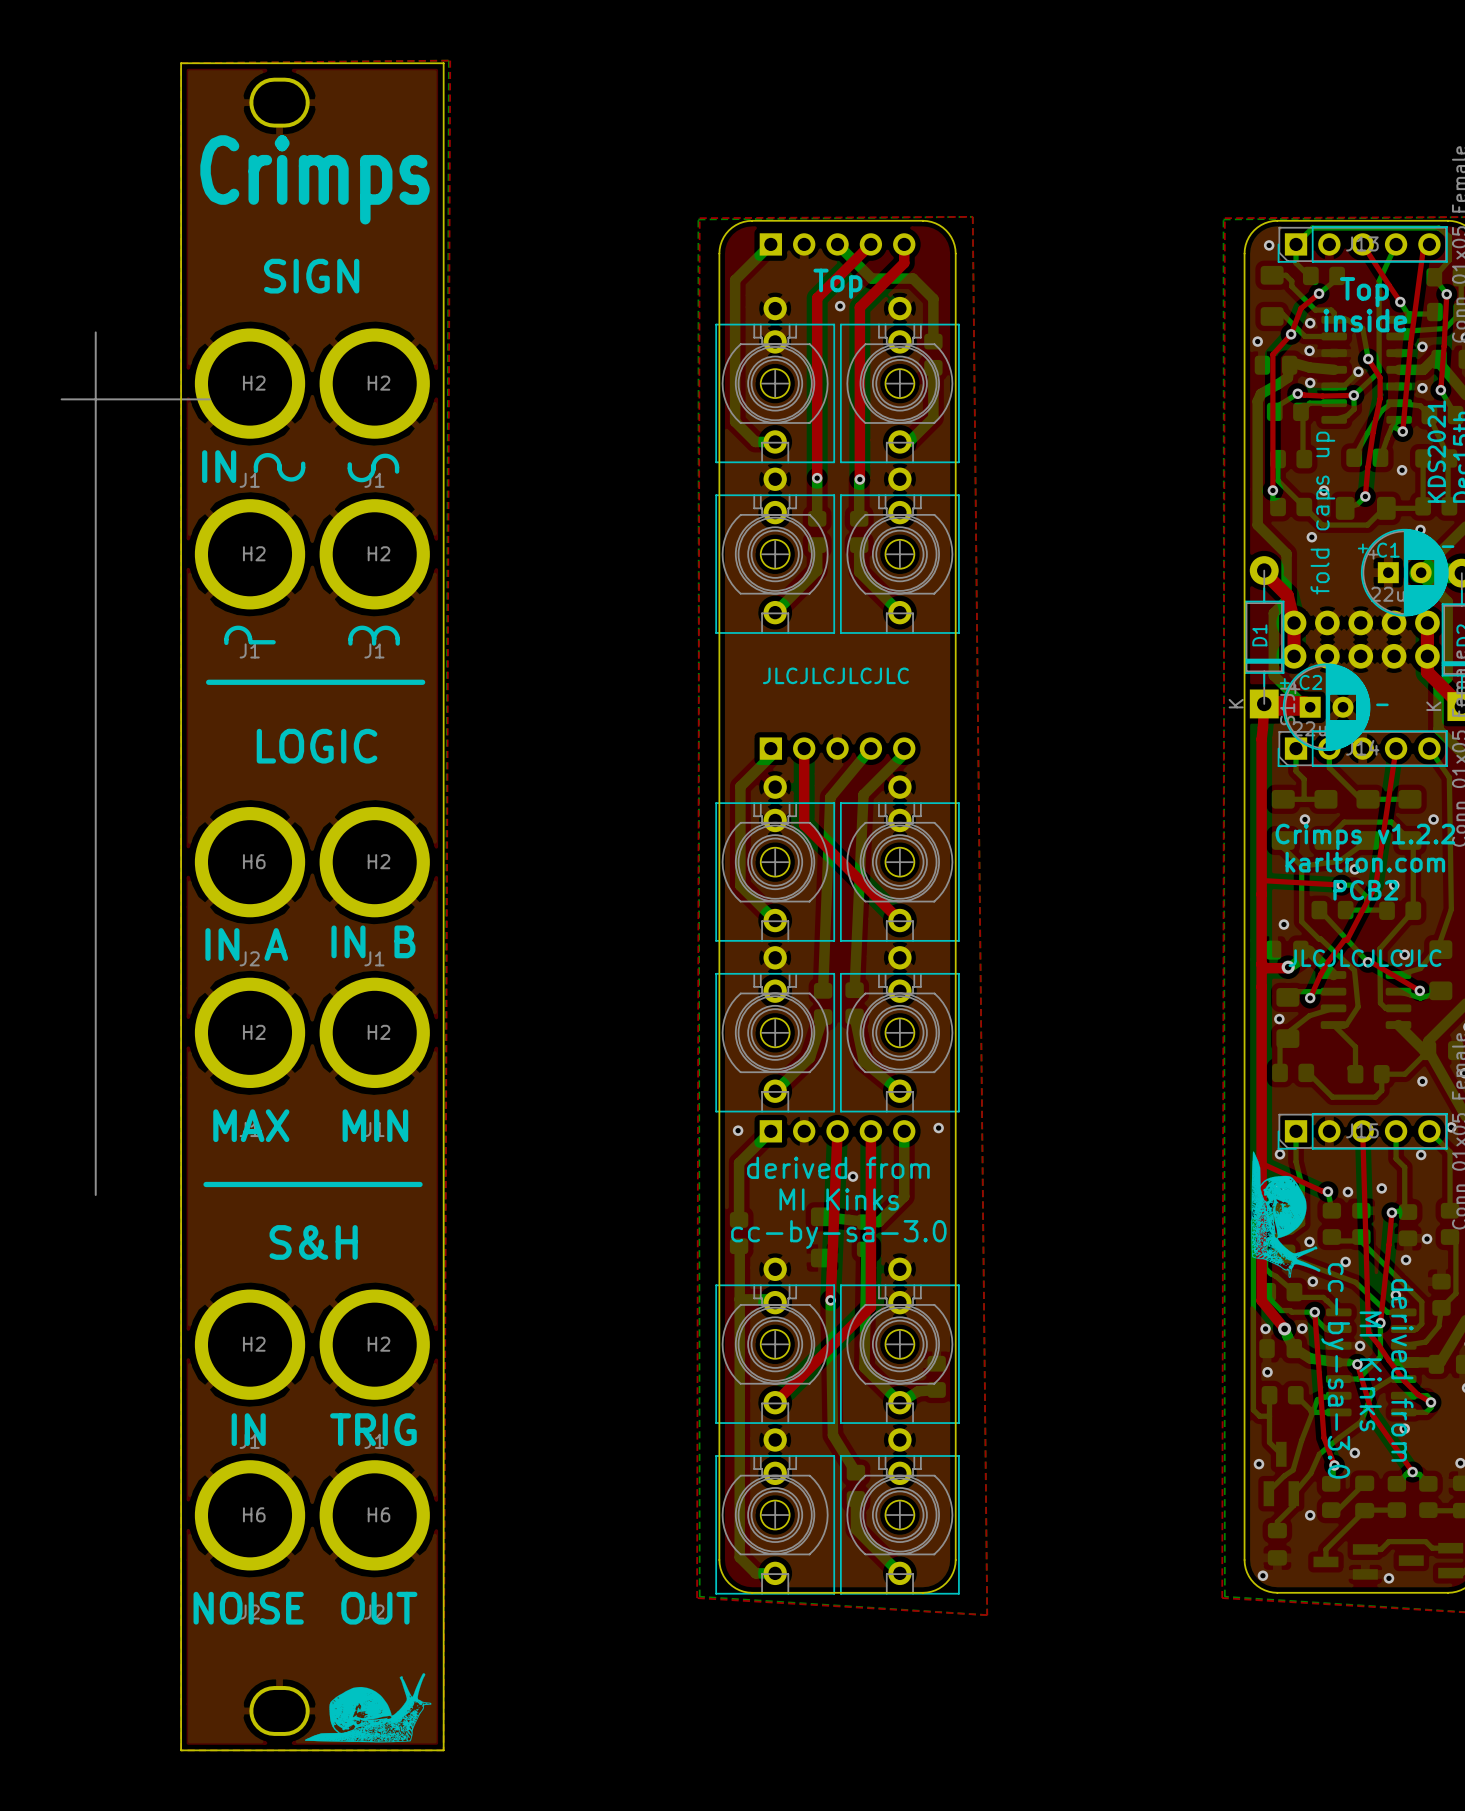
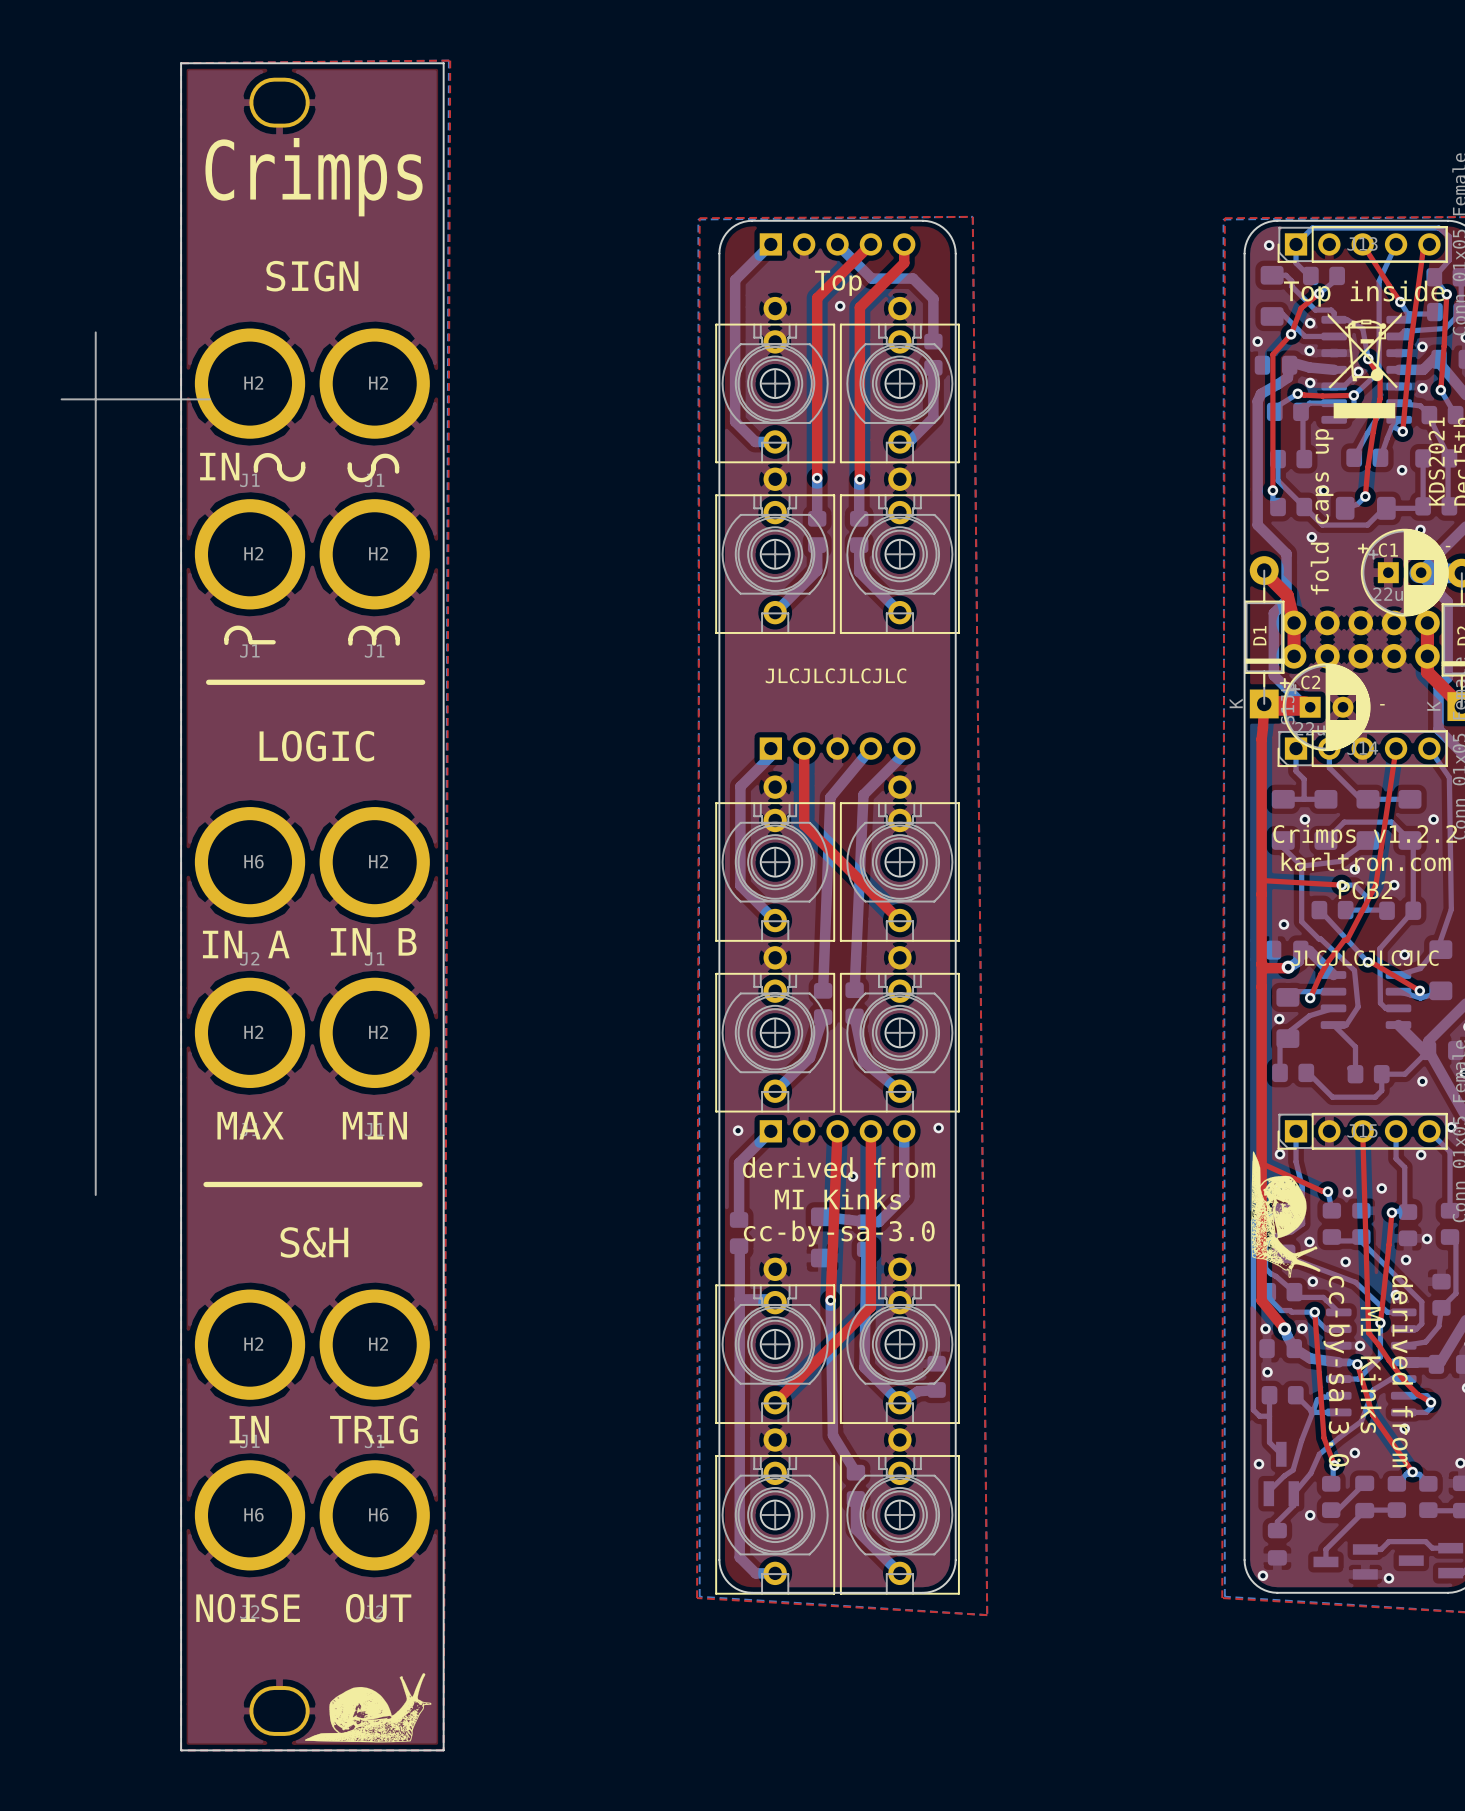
text: Top (1364, 292) -> Top inside (1364, 293)
drawing: none -> [1327, 312, 1402, 419]
text: inside (1365, 320) -> none

